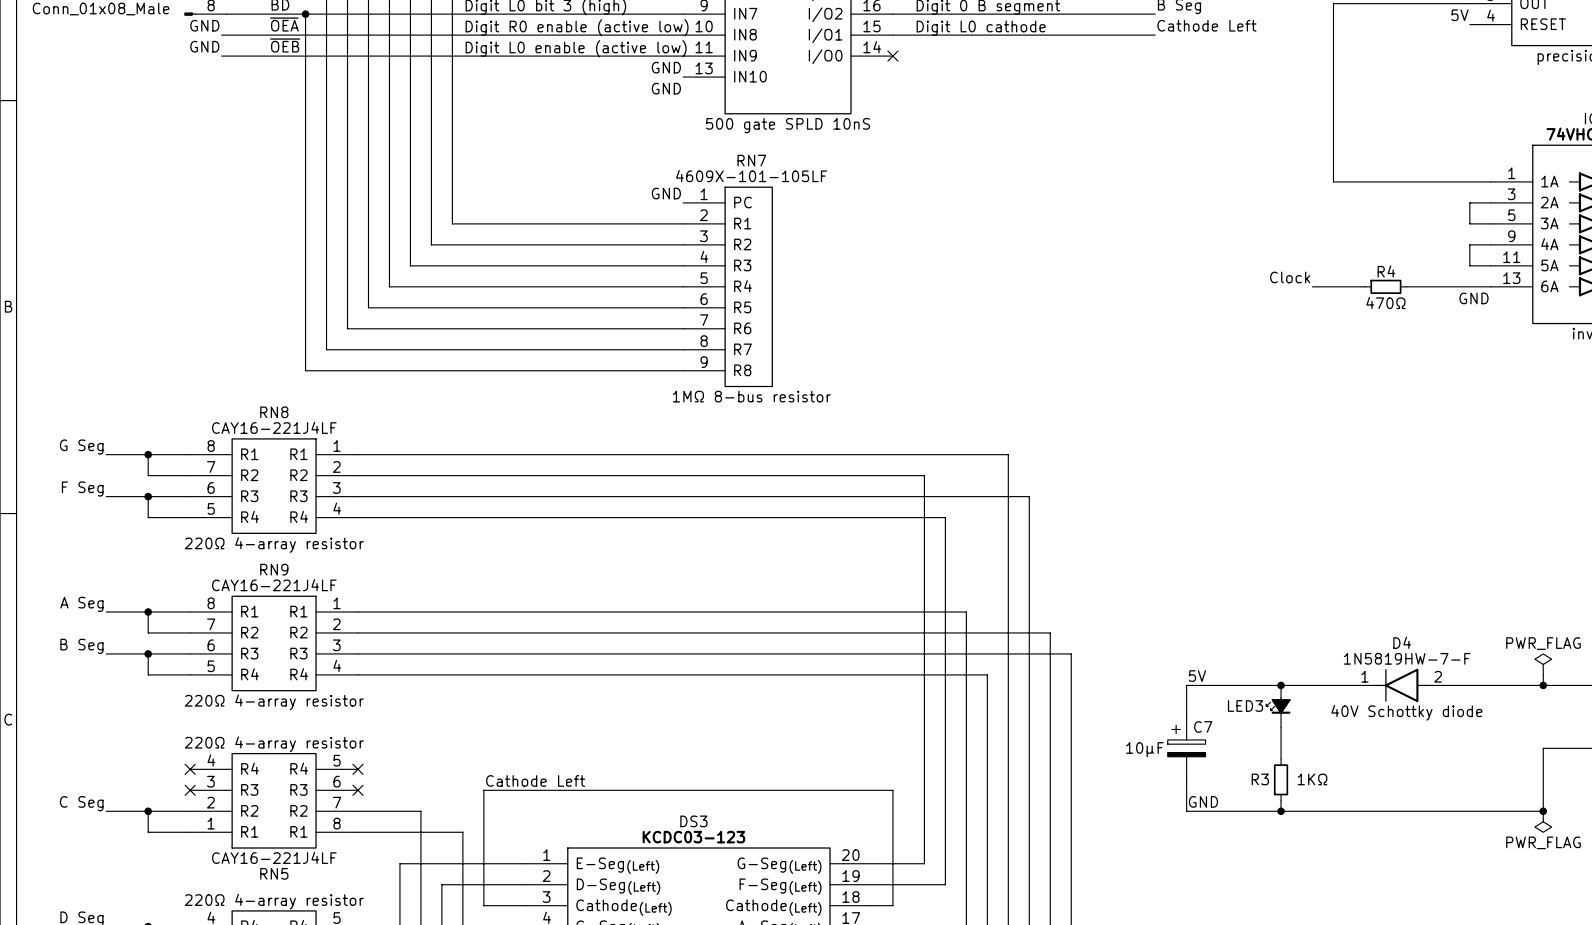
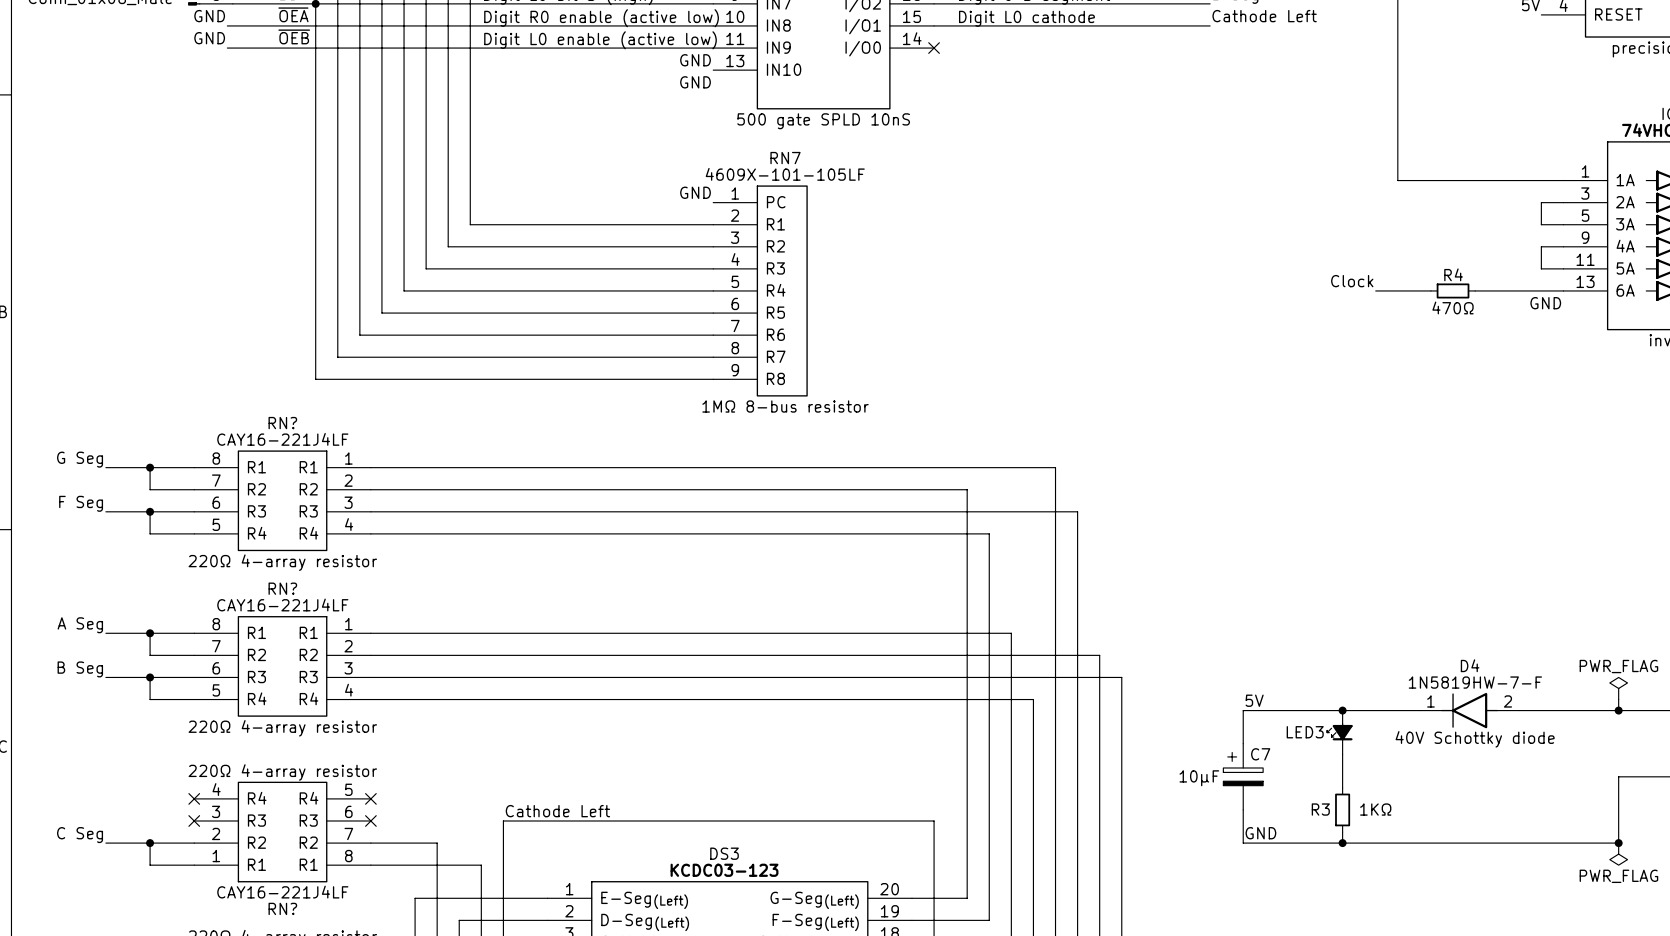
RN8 name: RN8 (274, 412) -> RN? (282, 423)
RN9 name: RN9 (274, 569) -> RN? (282, 588)
RN5 name: RN5 (274, 873) -> RN? (282, 908)

